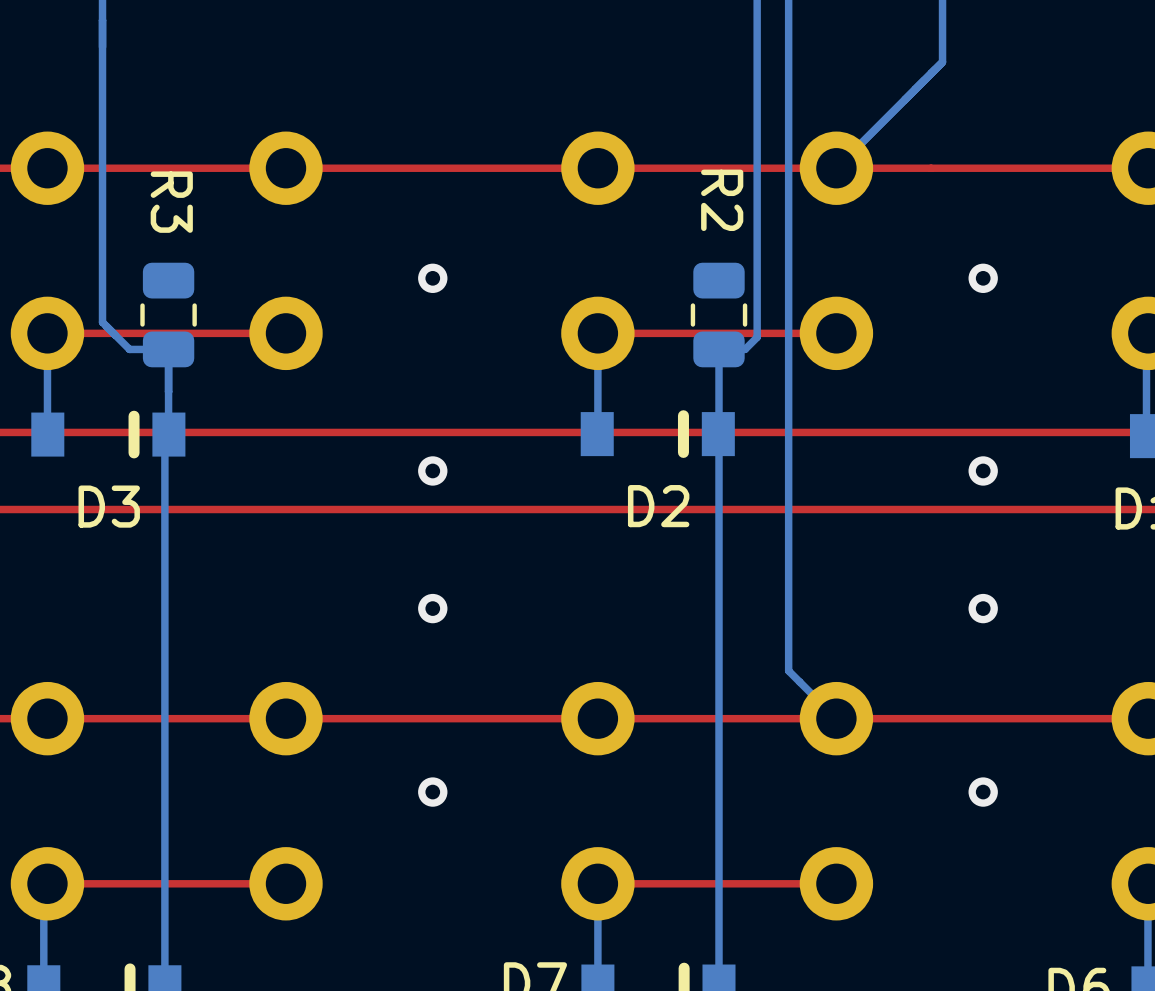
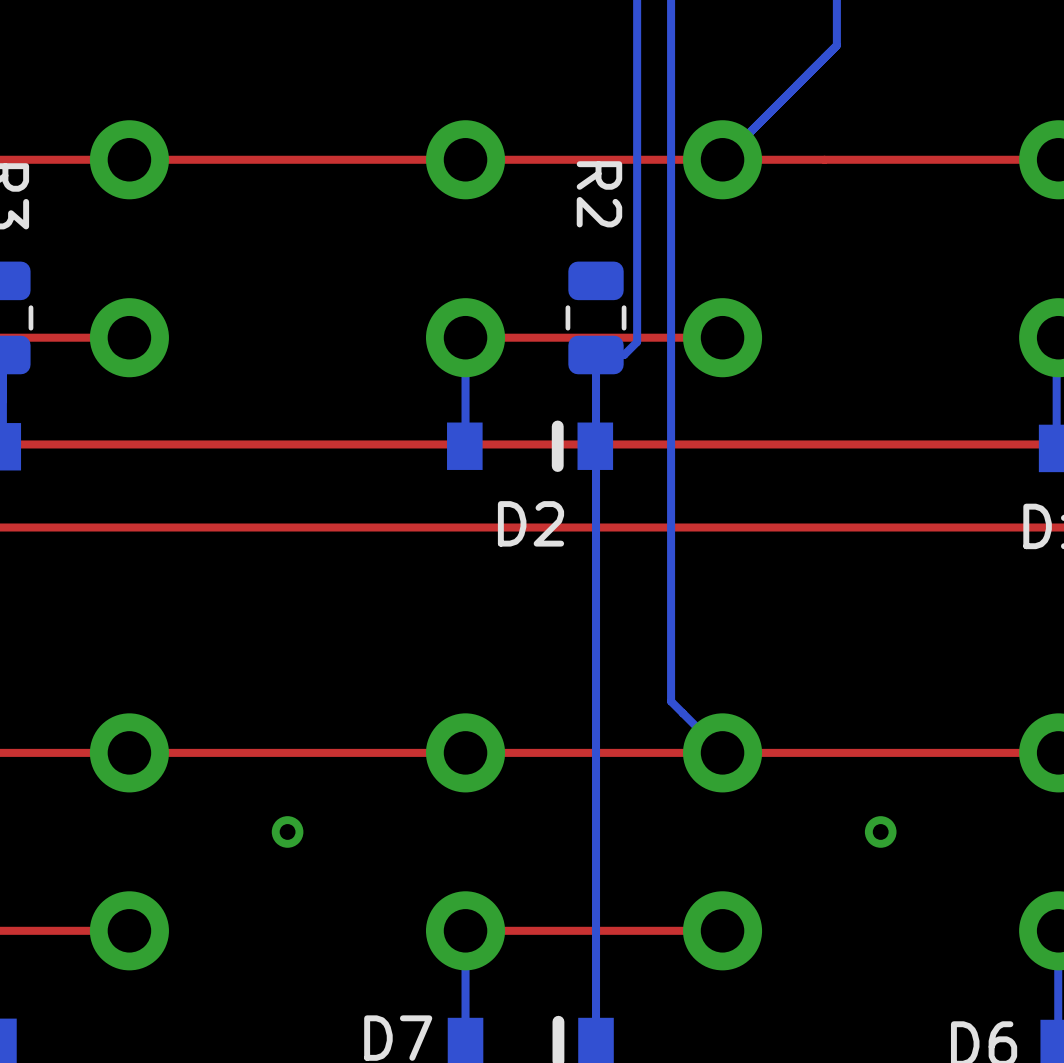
via: (432, 278) -> none
via: (983, 278) -> none
via: (432, 470) -> none
via: (983, 470) -> none
via: (432, 608) -> none
via: (983, 608) -> none

